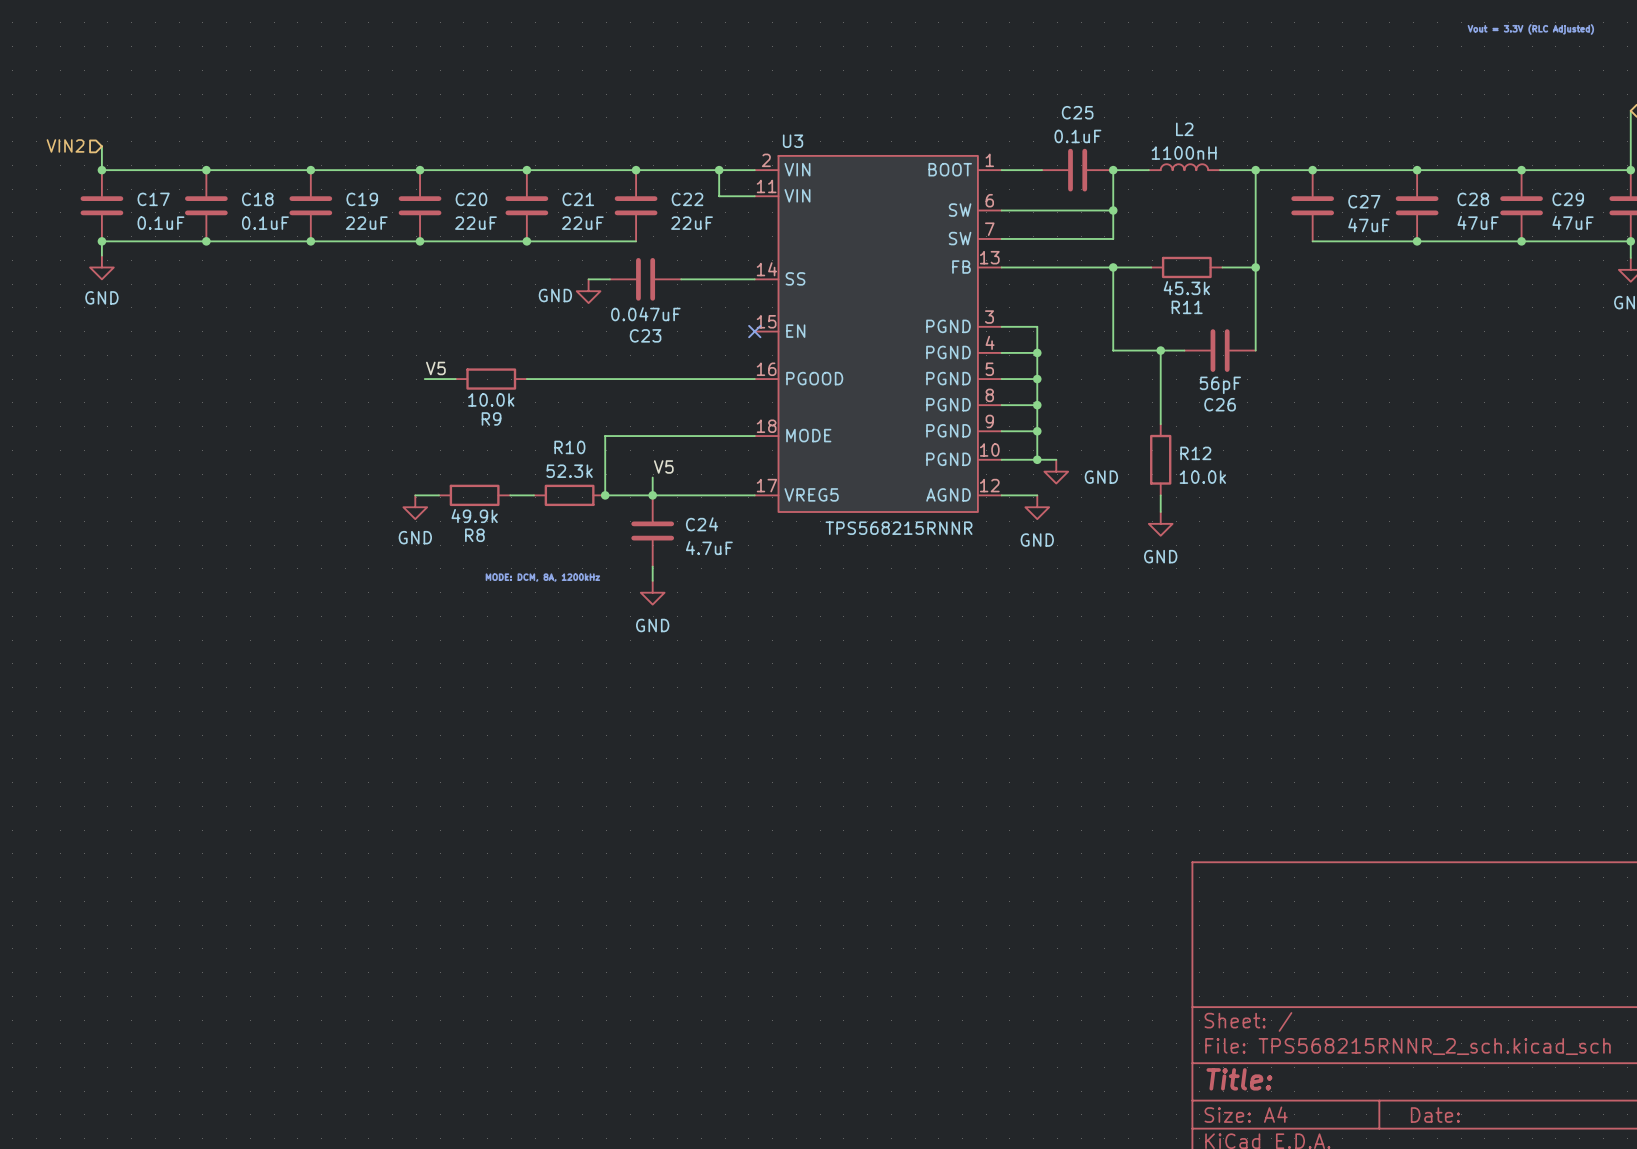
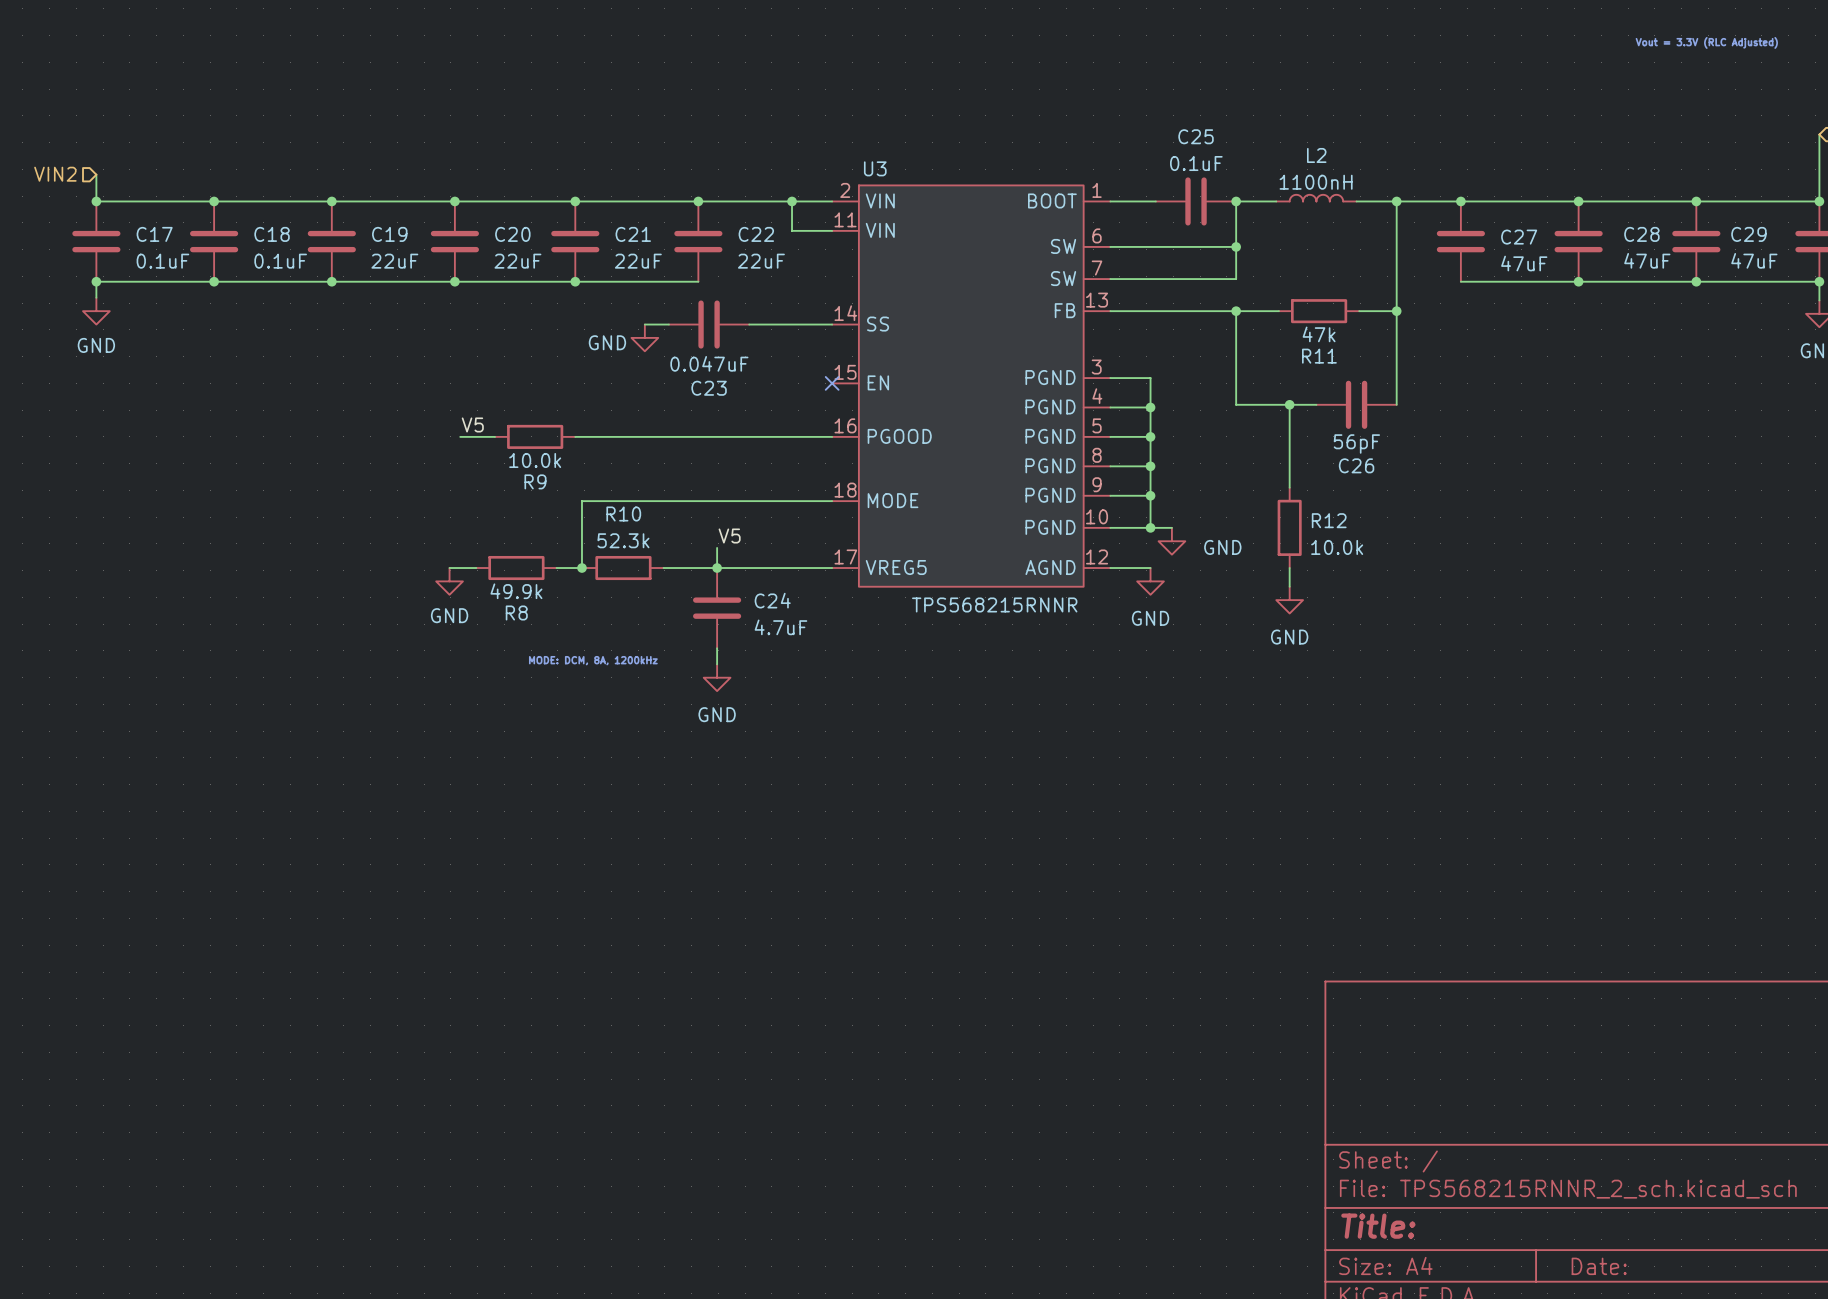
R11 value: 45.3k (1186, 288) -> 47k (1319, 334)
wire: (605, 436) (605, 495) -> (663, 501) (581, 501) (581, 568)
junction: none -> (581, 568)
junction: (605, 495) -> none

